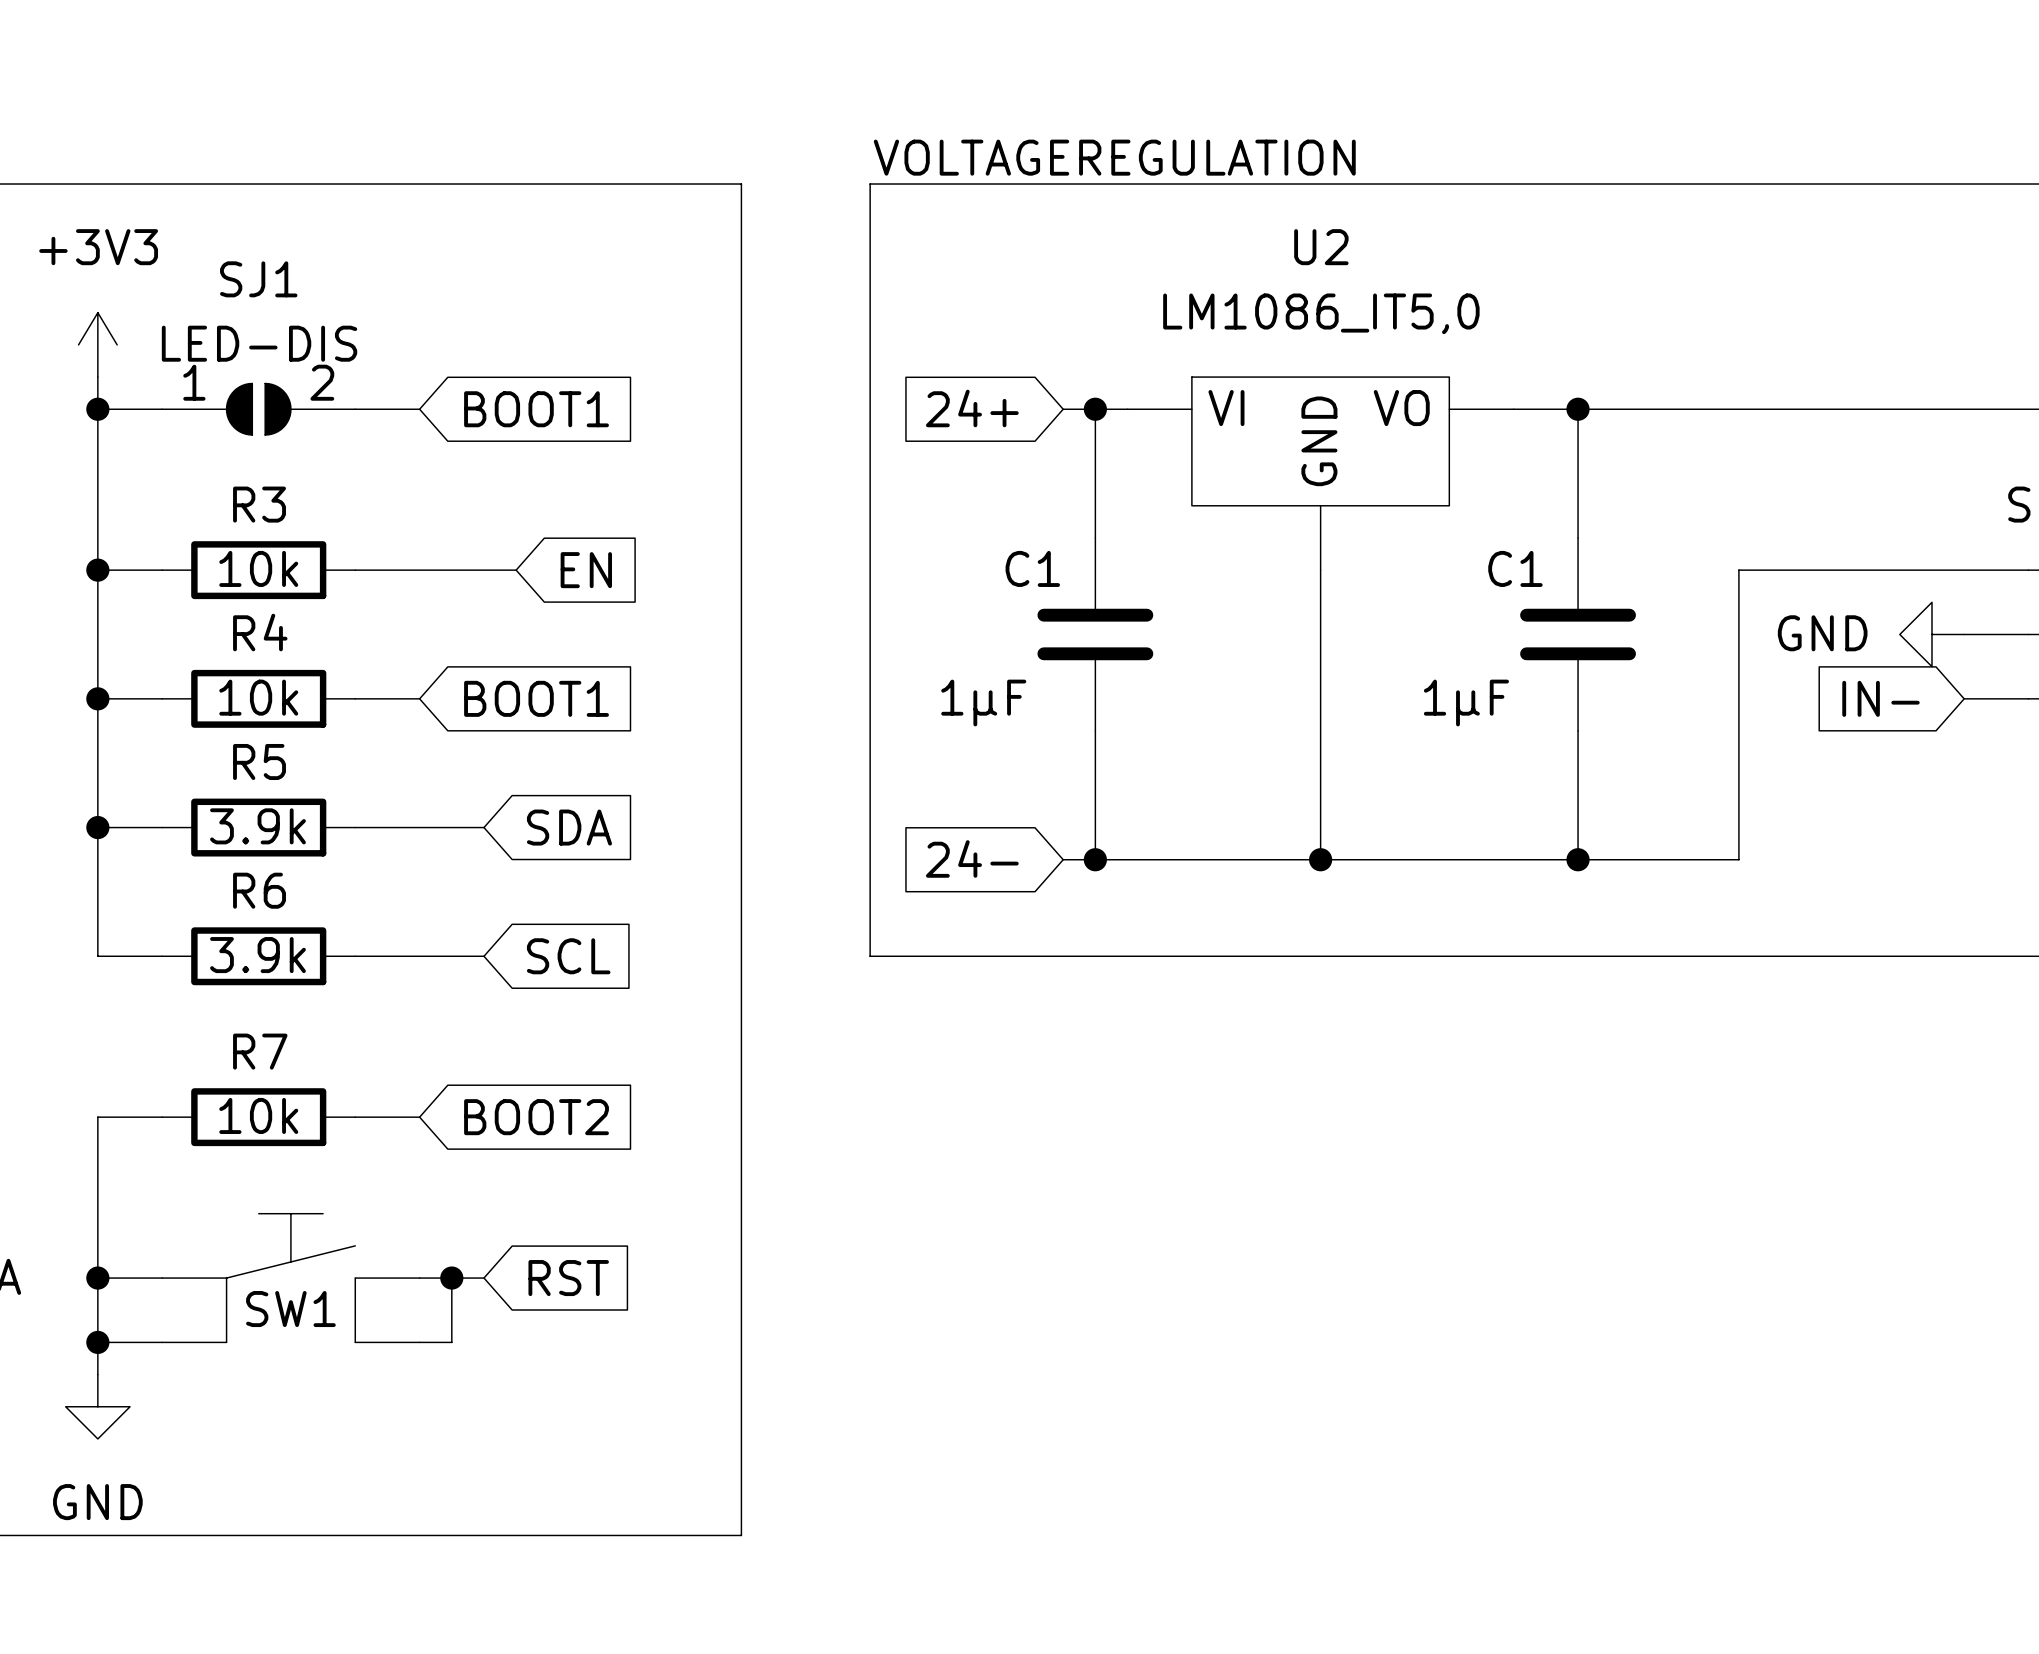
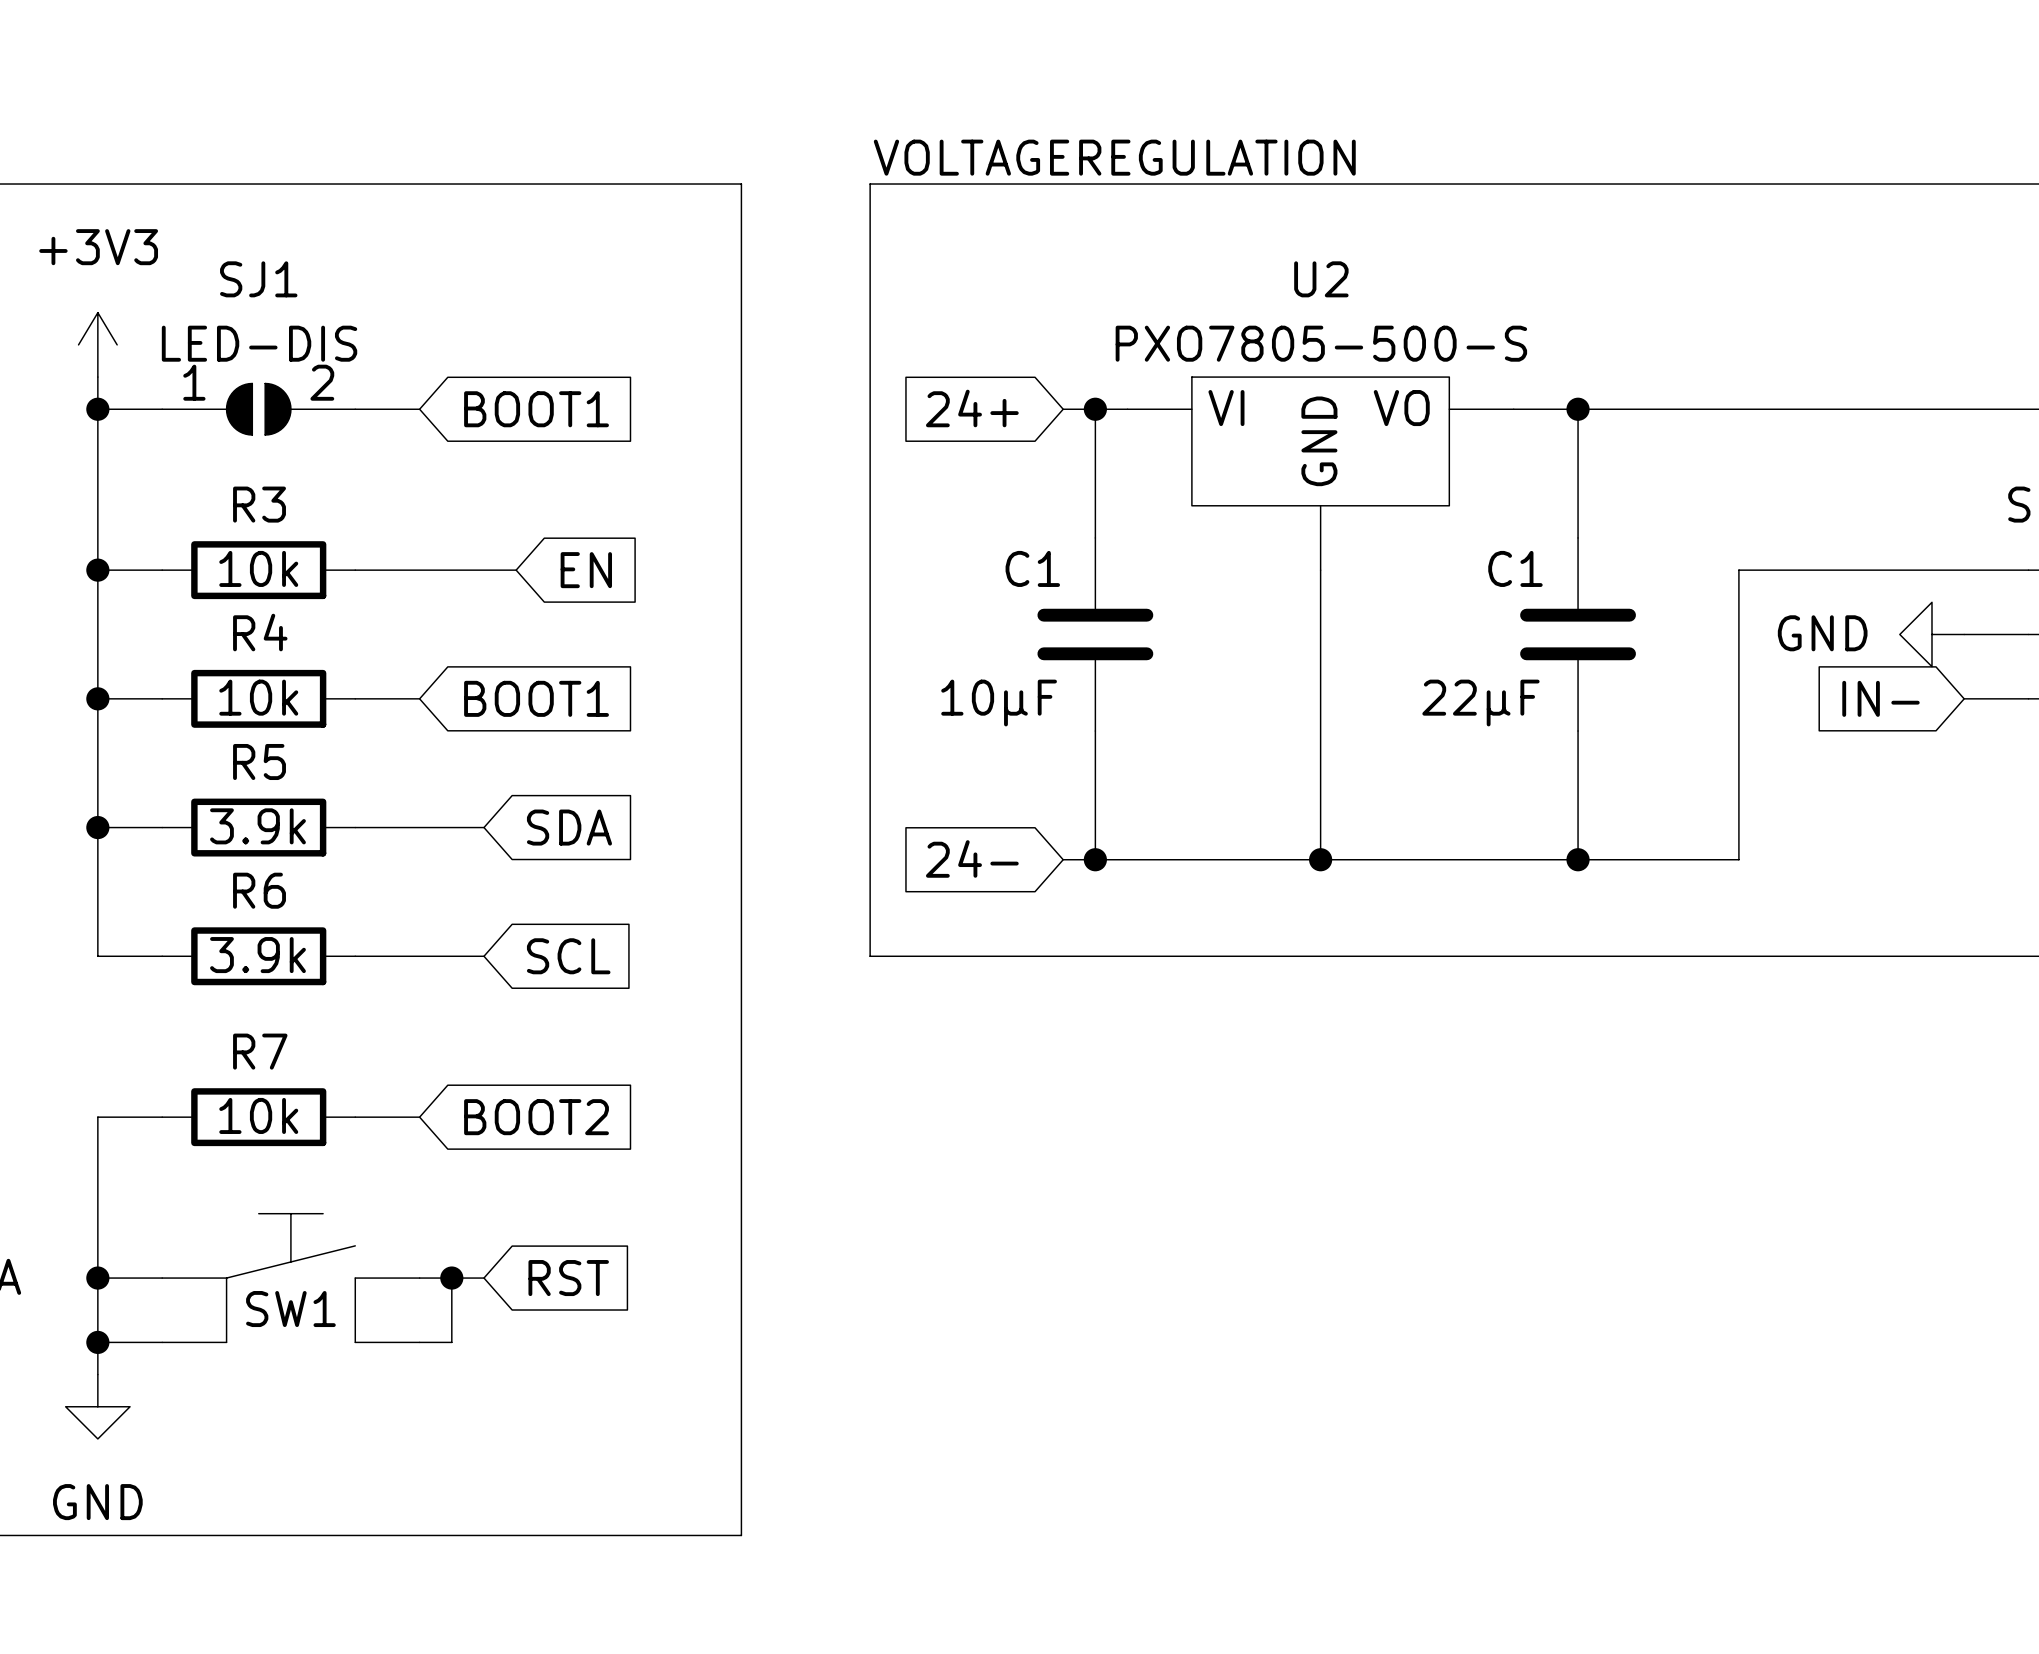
U2 name position: U2 (1321, 247) -> U2 (1321, 279)
U2 value: LM1086_IT5,0 (1321, 313) -> PXO7805-500-S (1321, 343)
C1 value: 1µF (983, 703) -> 10µF (999, 703)
C1 value: 1µF (1466, 703) -> 22µF (1480, 703)

